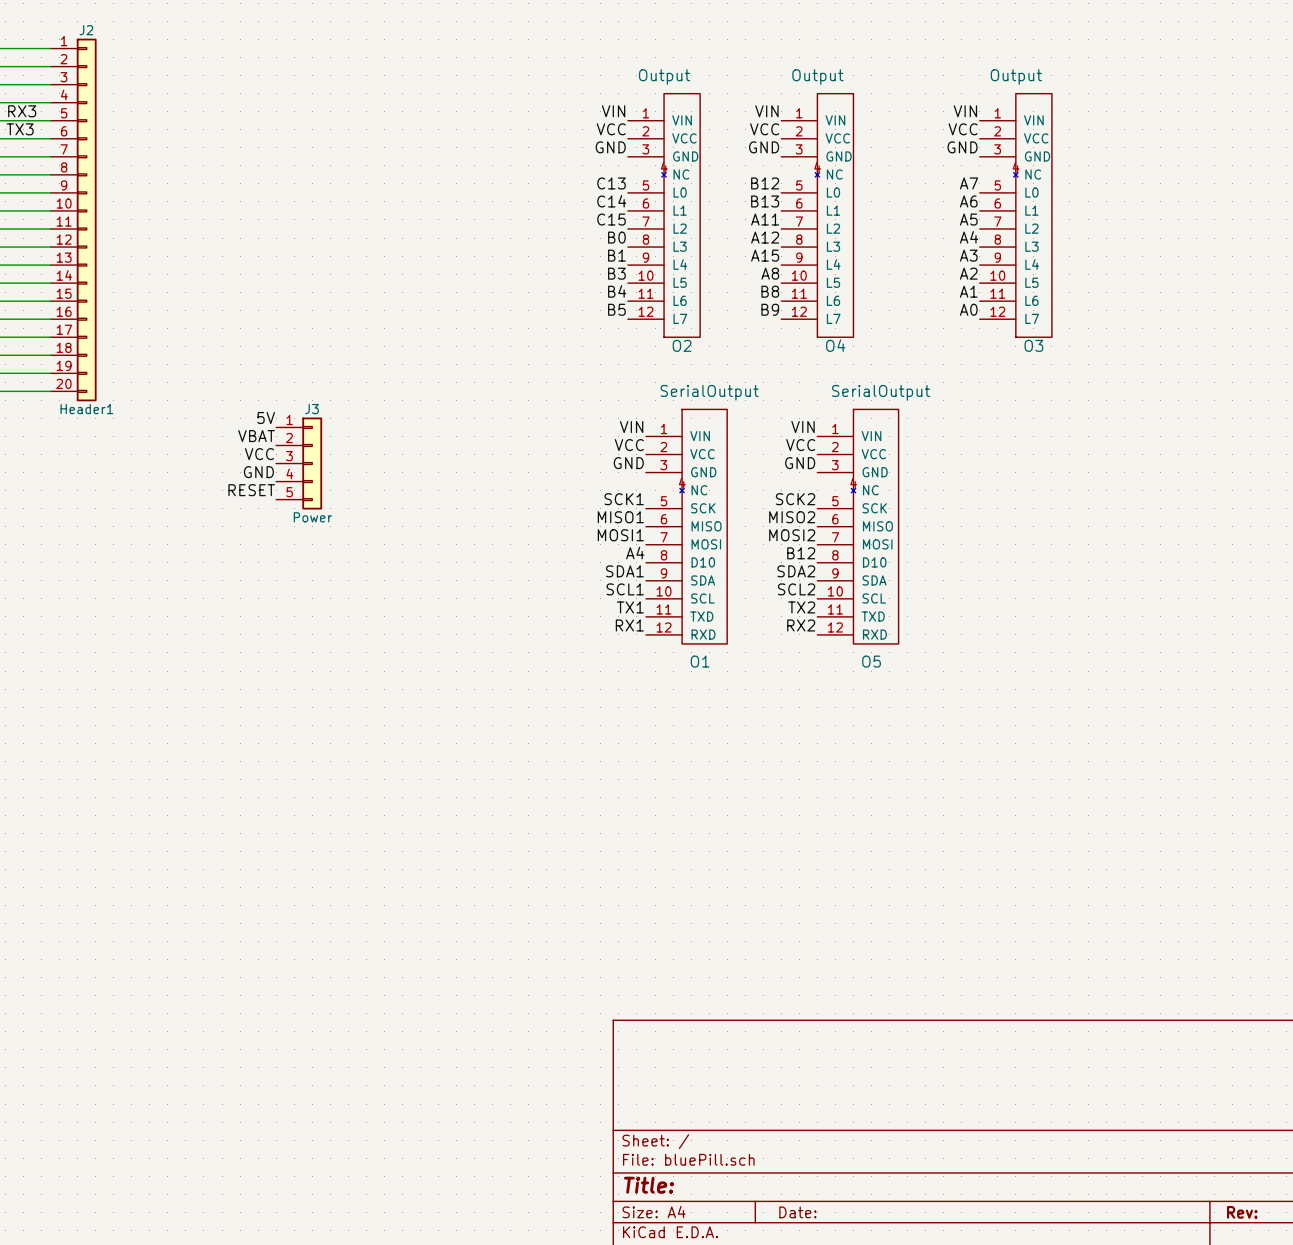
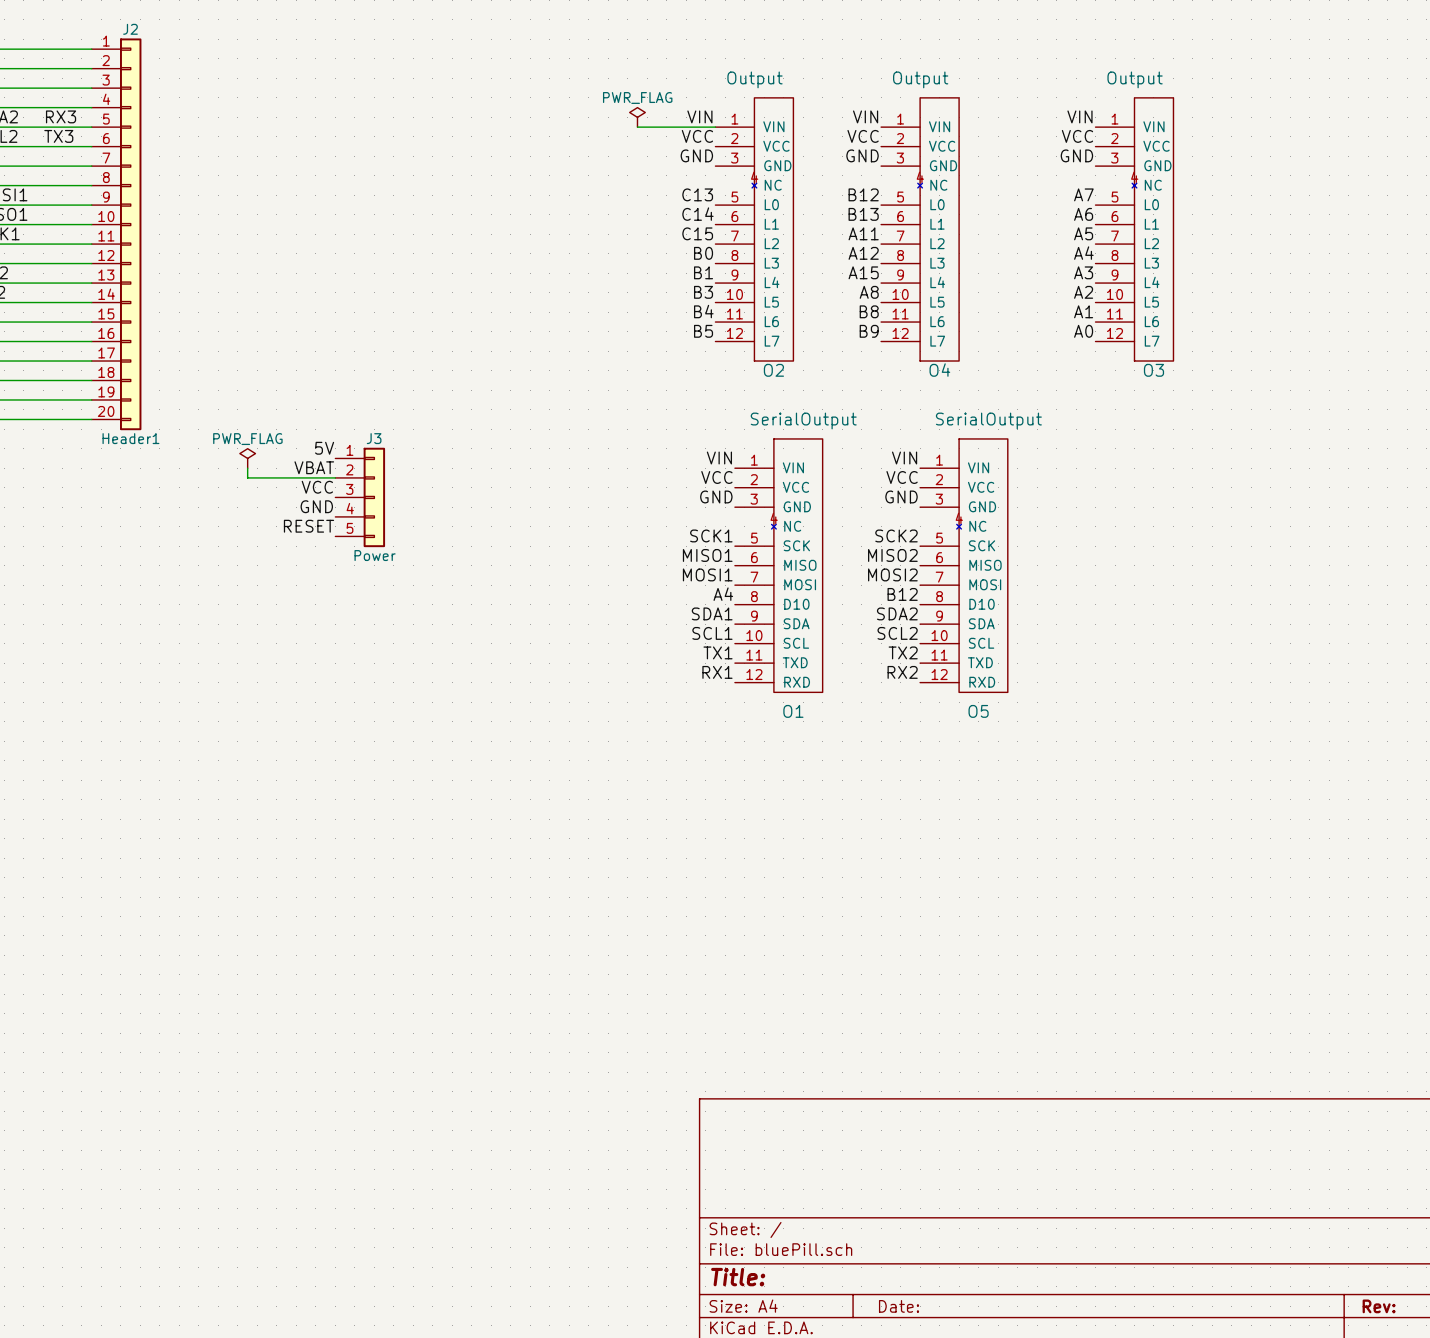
power symbol: none -> PWR_FLAG (637, 117)
wire: none -> (637, 127) (715, 127)
power symbol: none -> PWR_FLAG (247, 458)
wire: none -> (247, 468) (247, 477) (335, 477)

